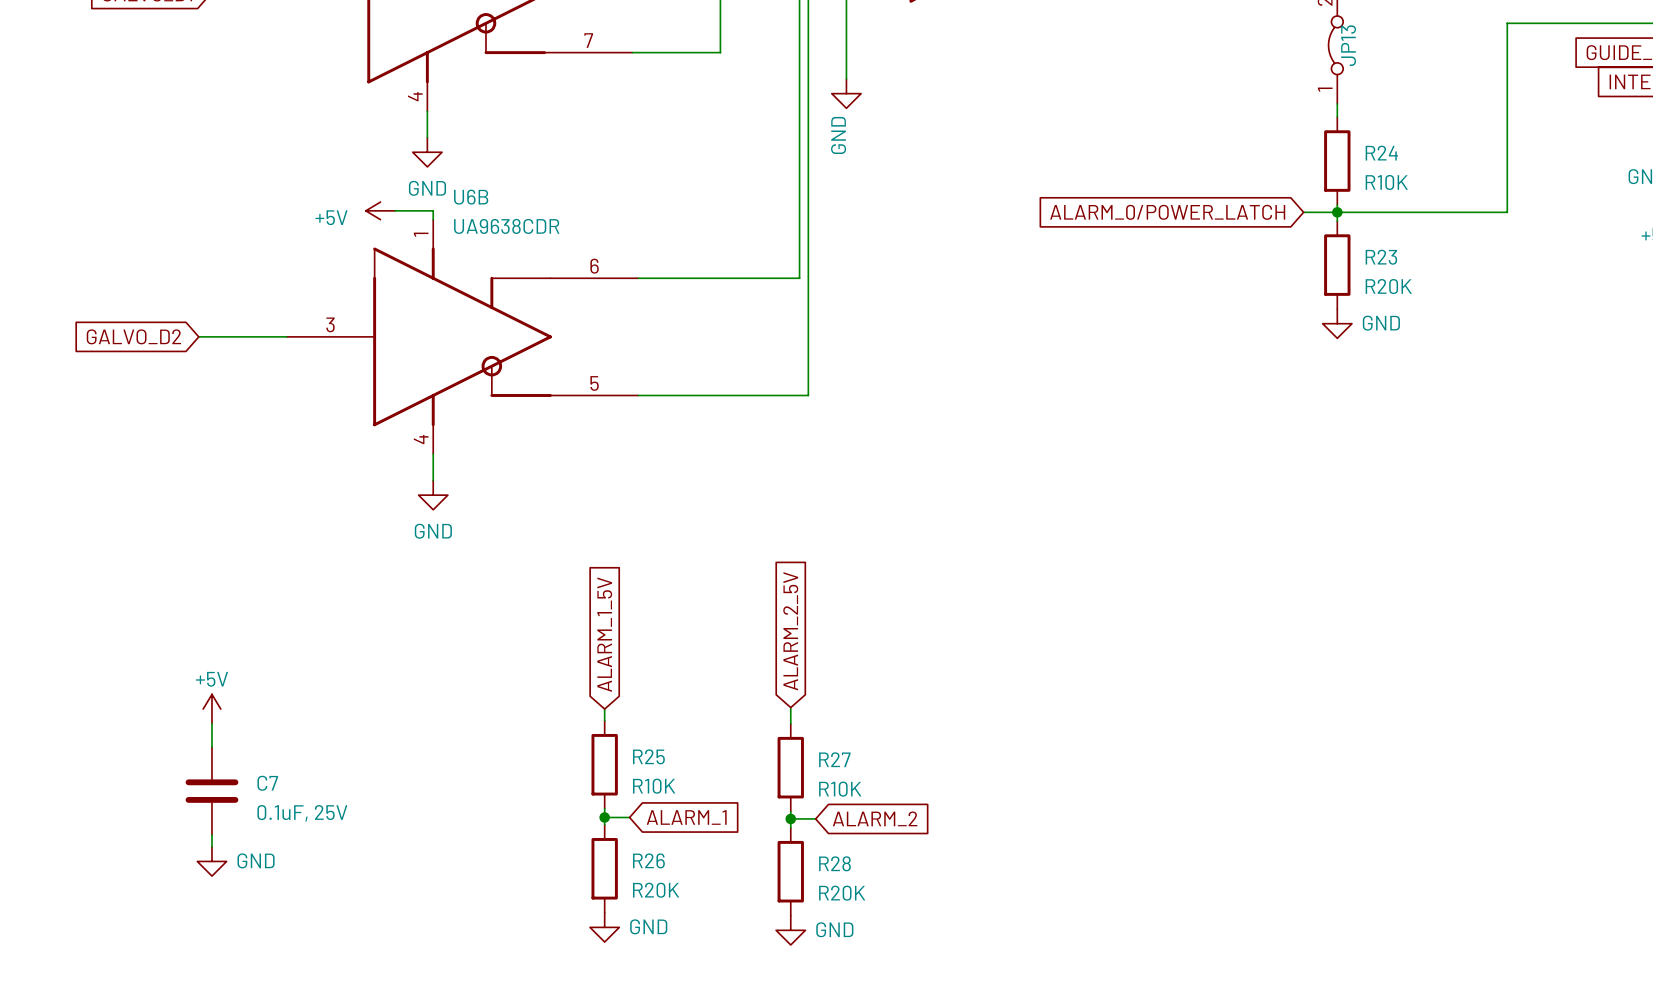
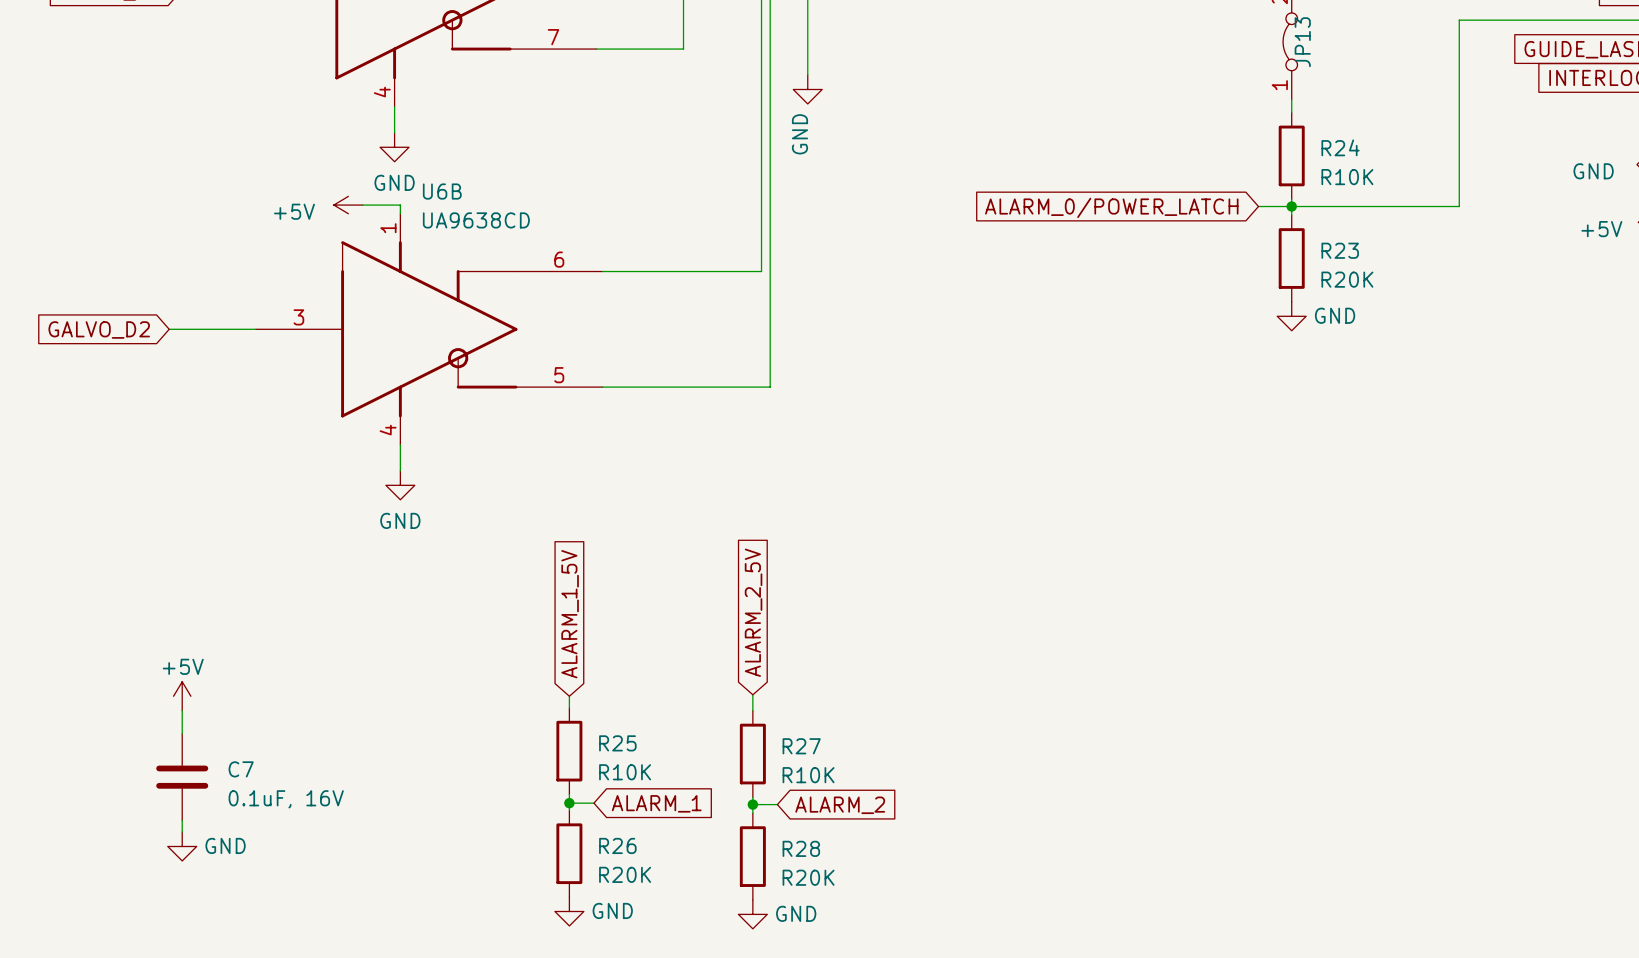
U6B value: UA9638CDR (506, 226) -> UA9638CD (476, 220)
C7 value: 0.1uF, 25V (302, 813) -> 0.1uF, 16V (286, 799)

